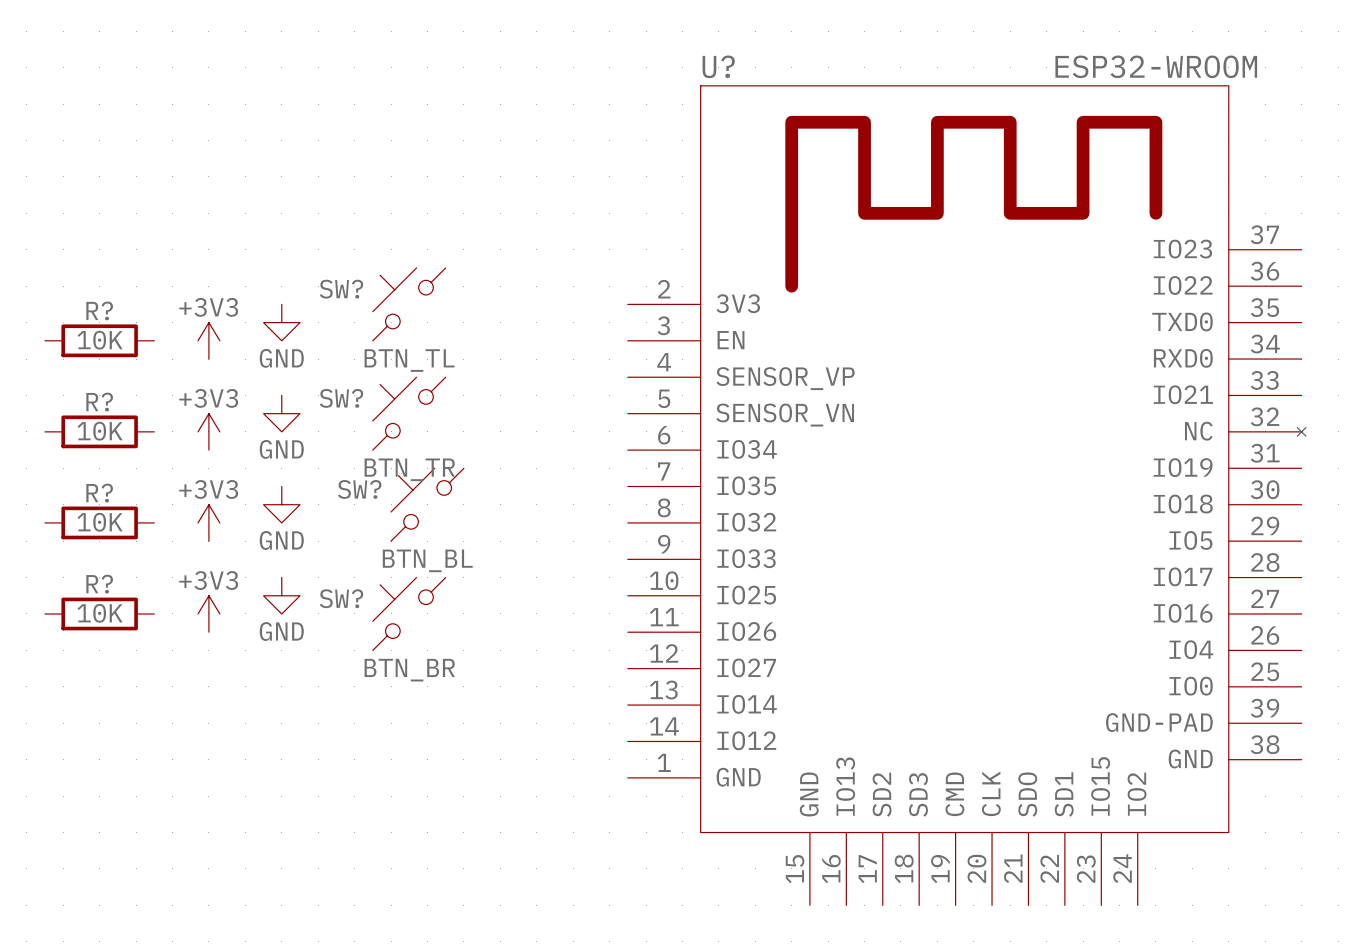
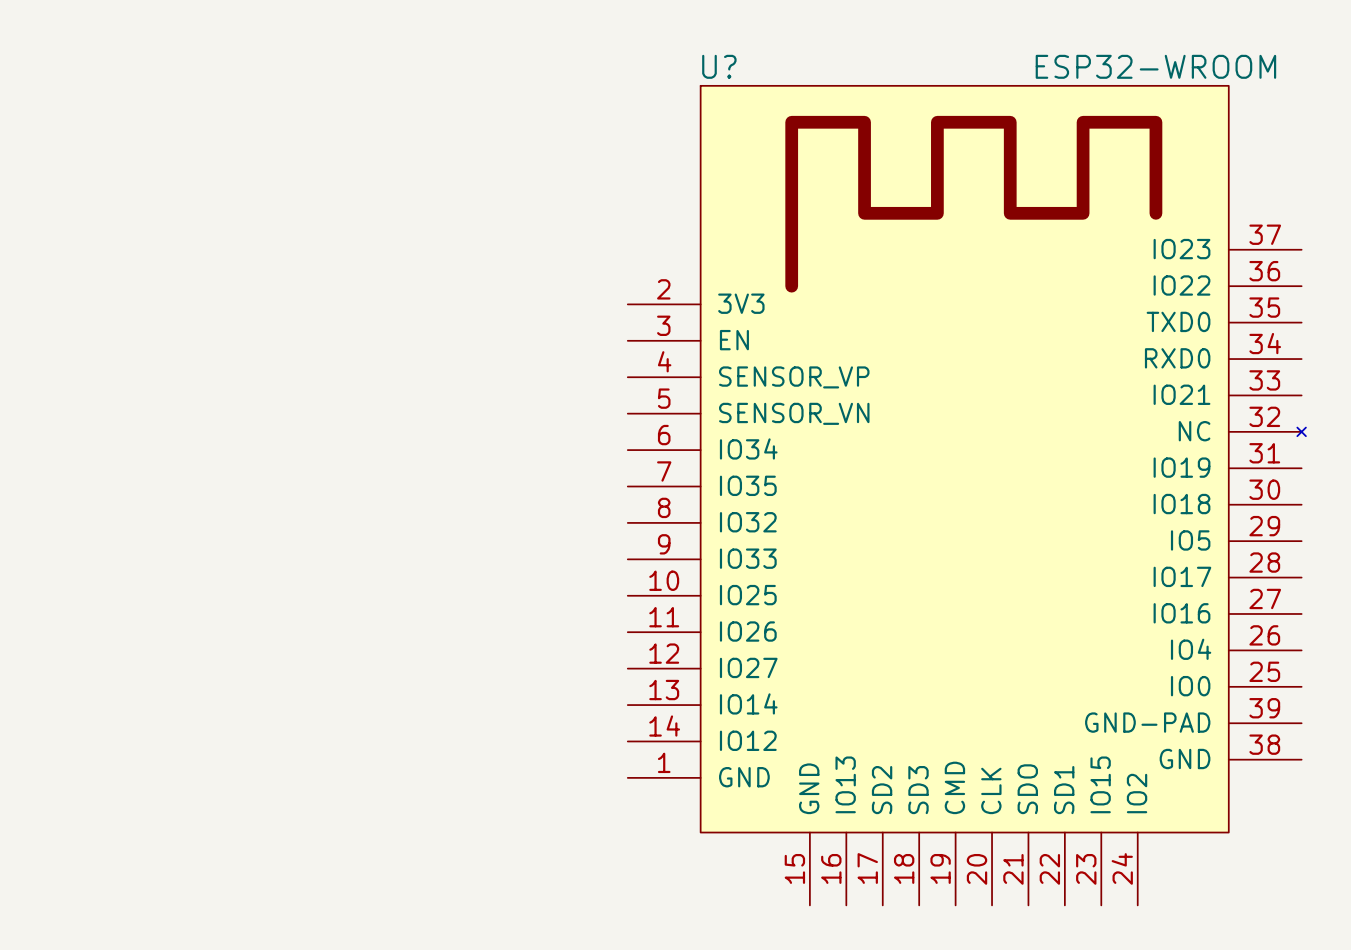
SW?: BTN_TL (409, 304) -> none
power symbol: GND (281, 322) -> none
R?: 10K (99, 340) -> none
power symbol: +3V3 (208, 340) -> none
power symbol: GND (281, 413) -> none
SW?: BTN_TR (409, 413) -> none
R?: 10K (99, 431) -> none
power symbol: +3V3 (208, 431) -> none
power symbol: GND (281, 504) -> none
SW?: BTN_BL (427, 504) -> none
R?: 10K (99, 522) -> none
power symbol: +3V3 (208, 522) -> none
power symbol: GND (281, 595) -> none
R?: 10K (99, 613) -> none
power symbol: +3V3 (208, 613) -> none
SW?: BTN_BR (409, 613) -> none

